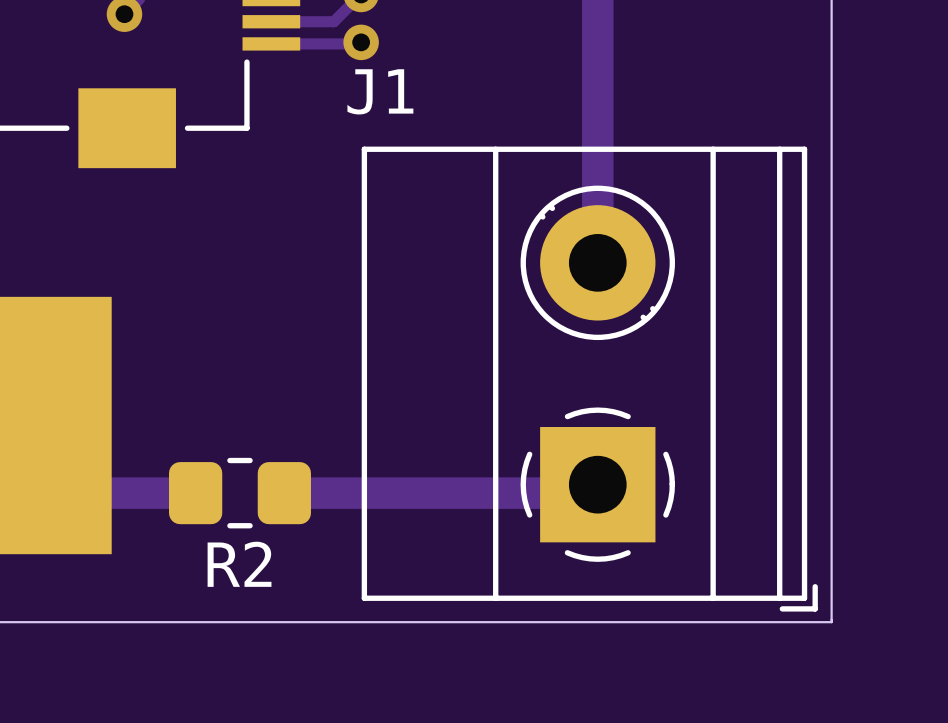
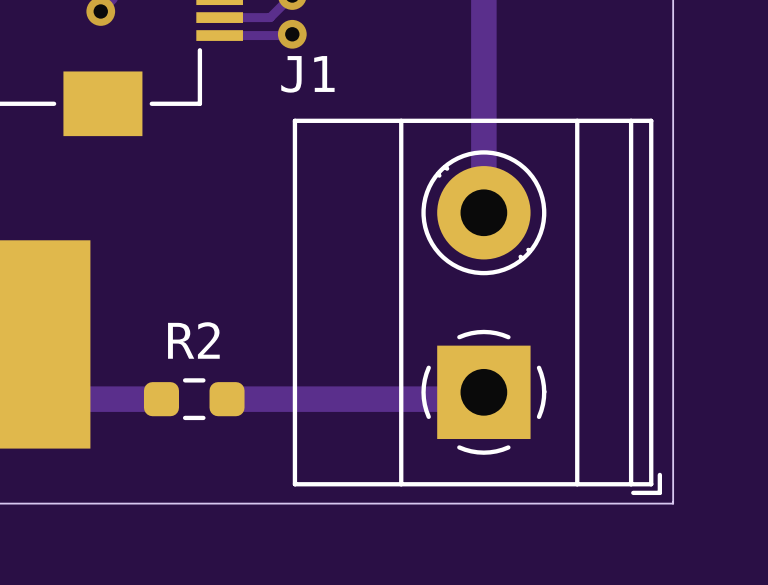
R2 footprint: [169, 457, 311, 529] -> [143, 378, 245, 421]
R2 name position: R2 (239, 564) -> R2 (193, 340)

